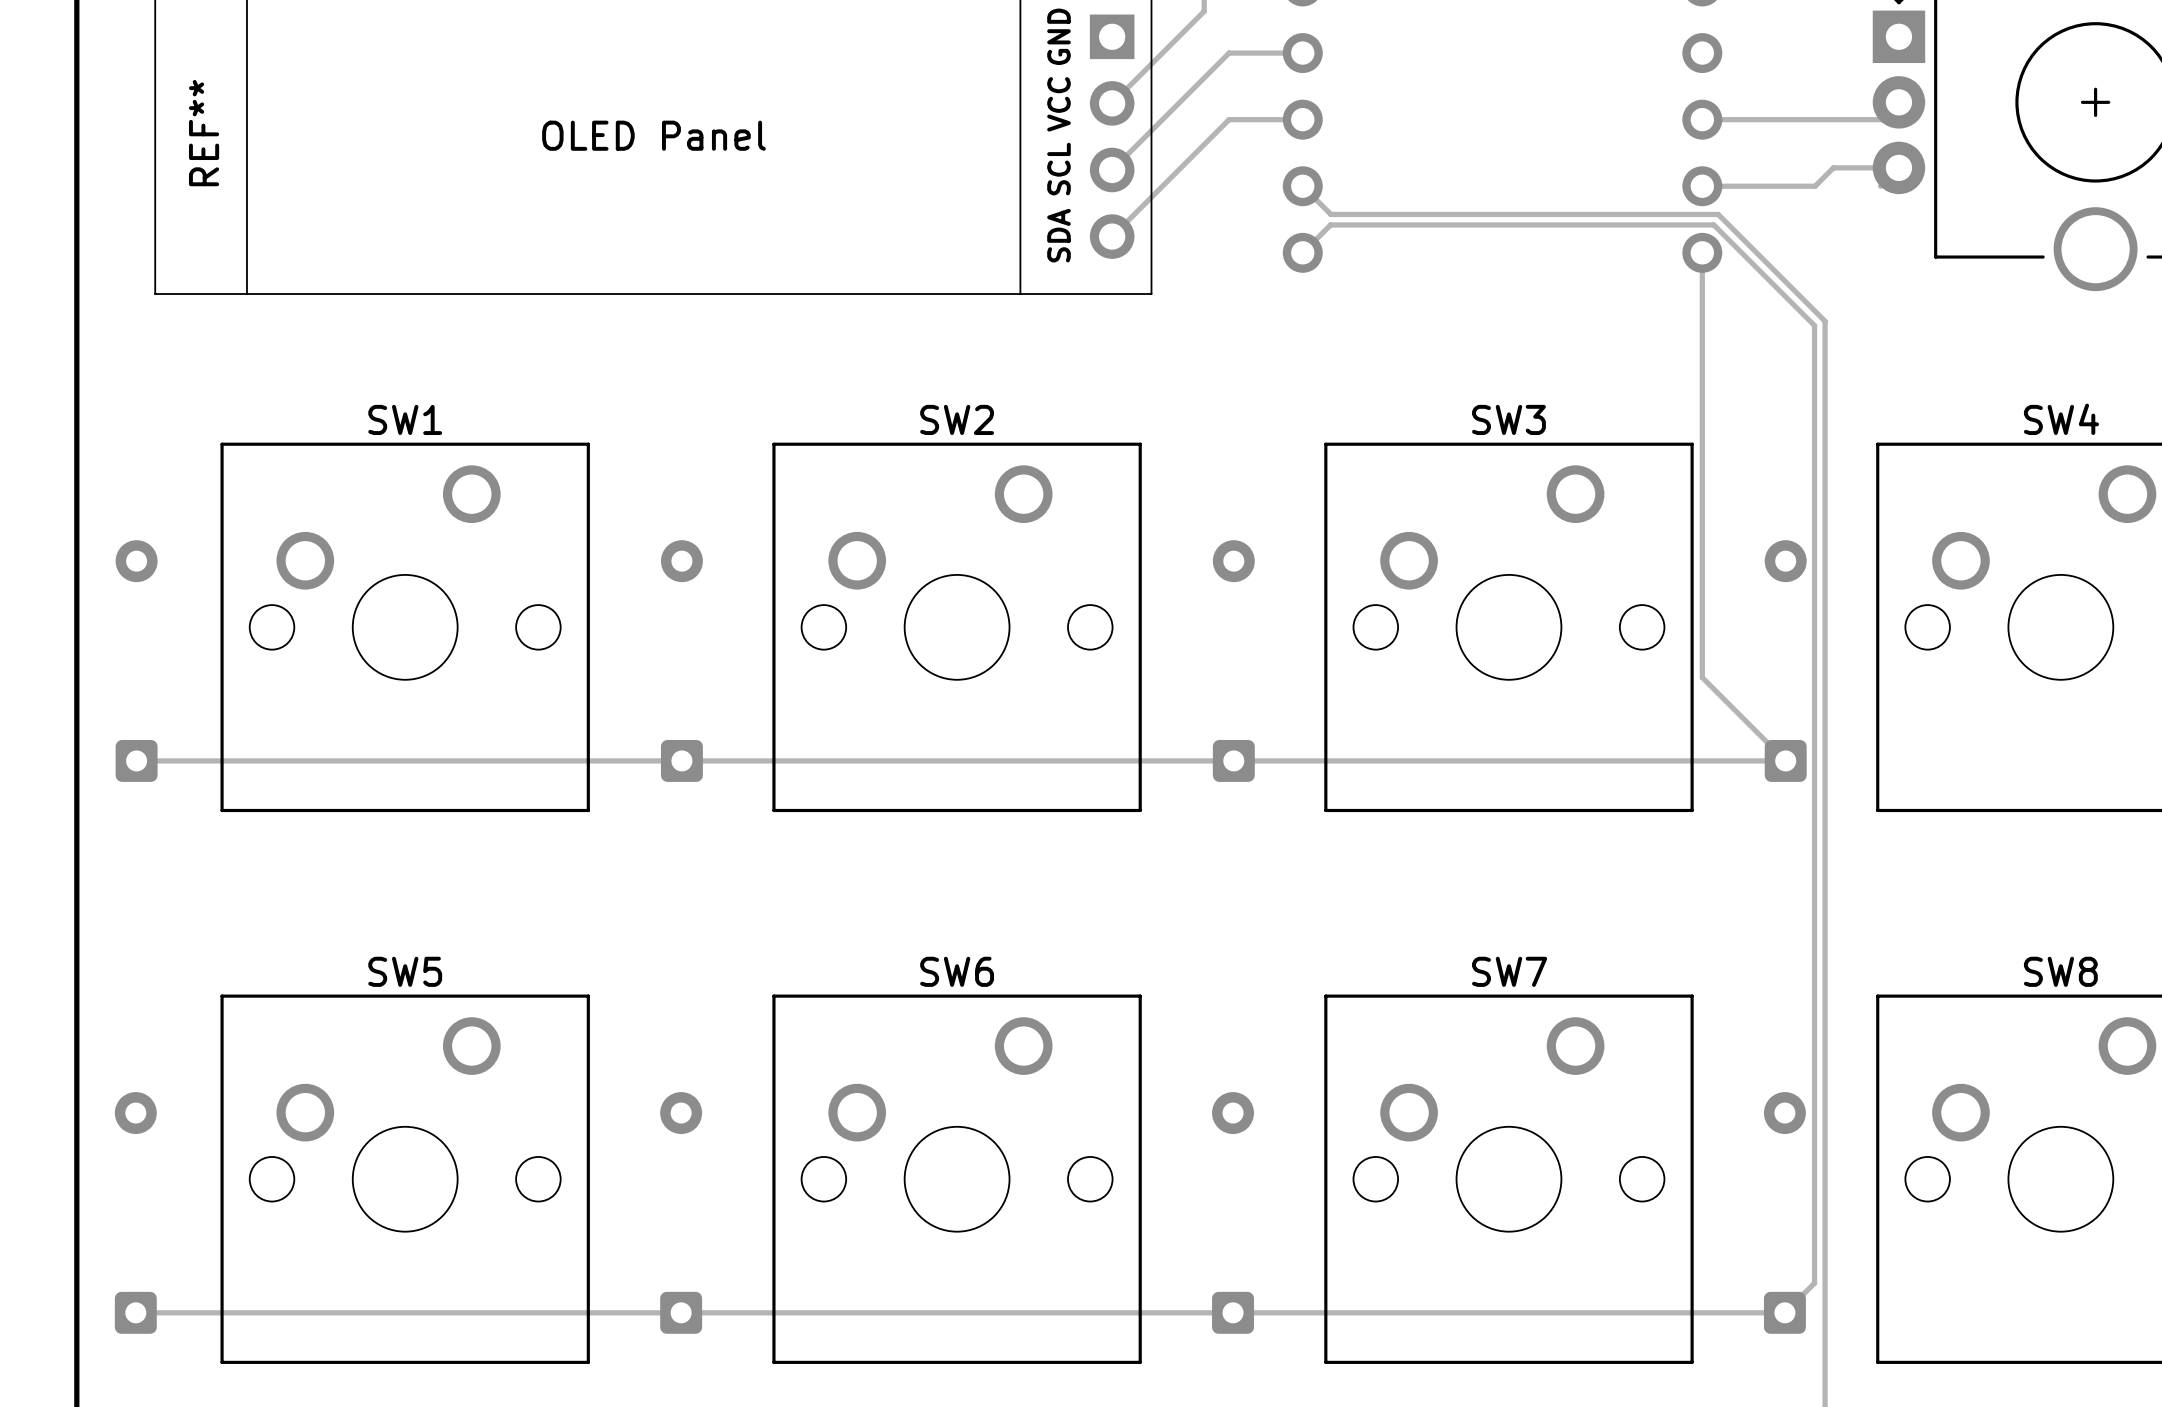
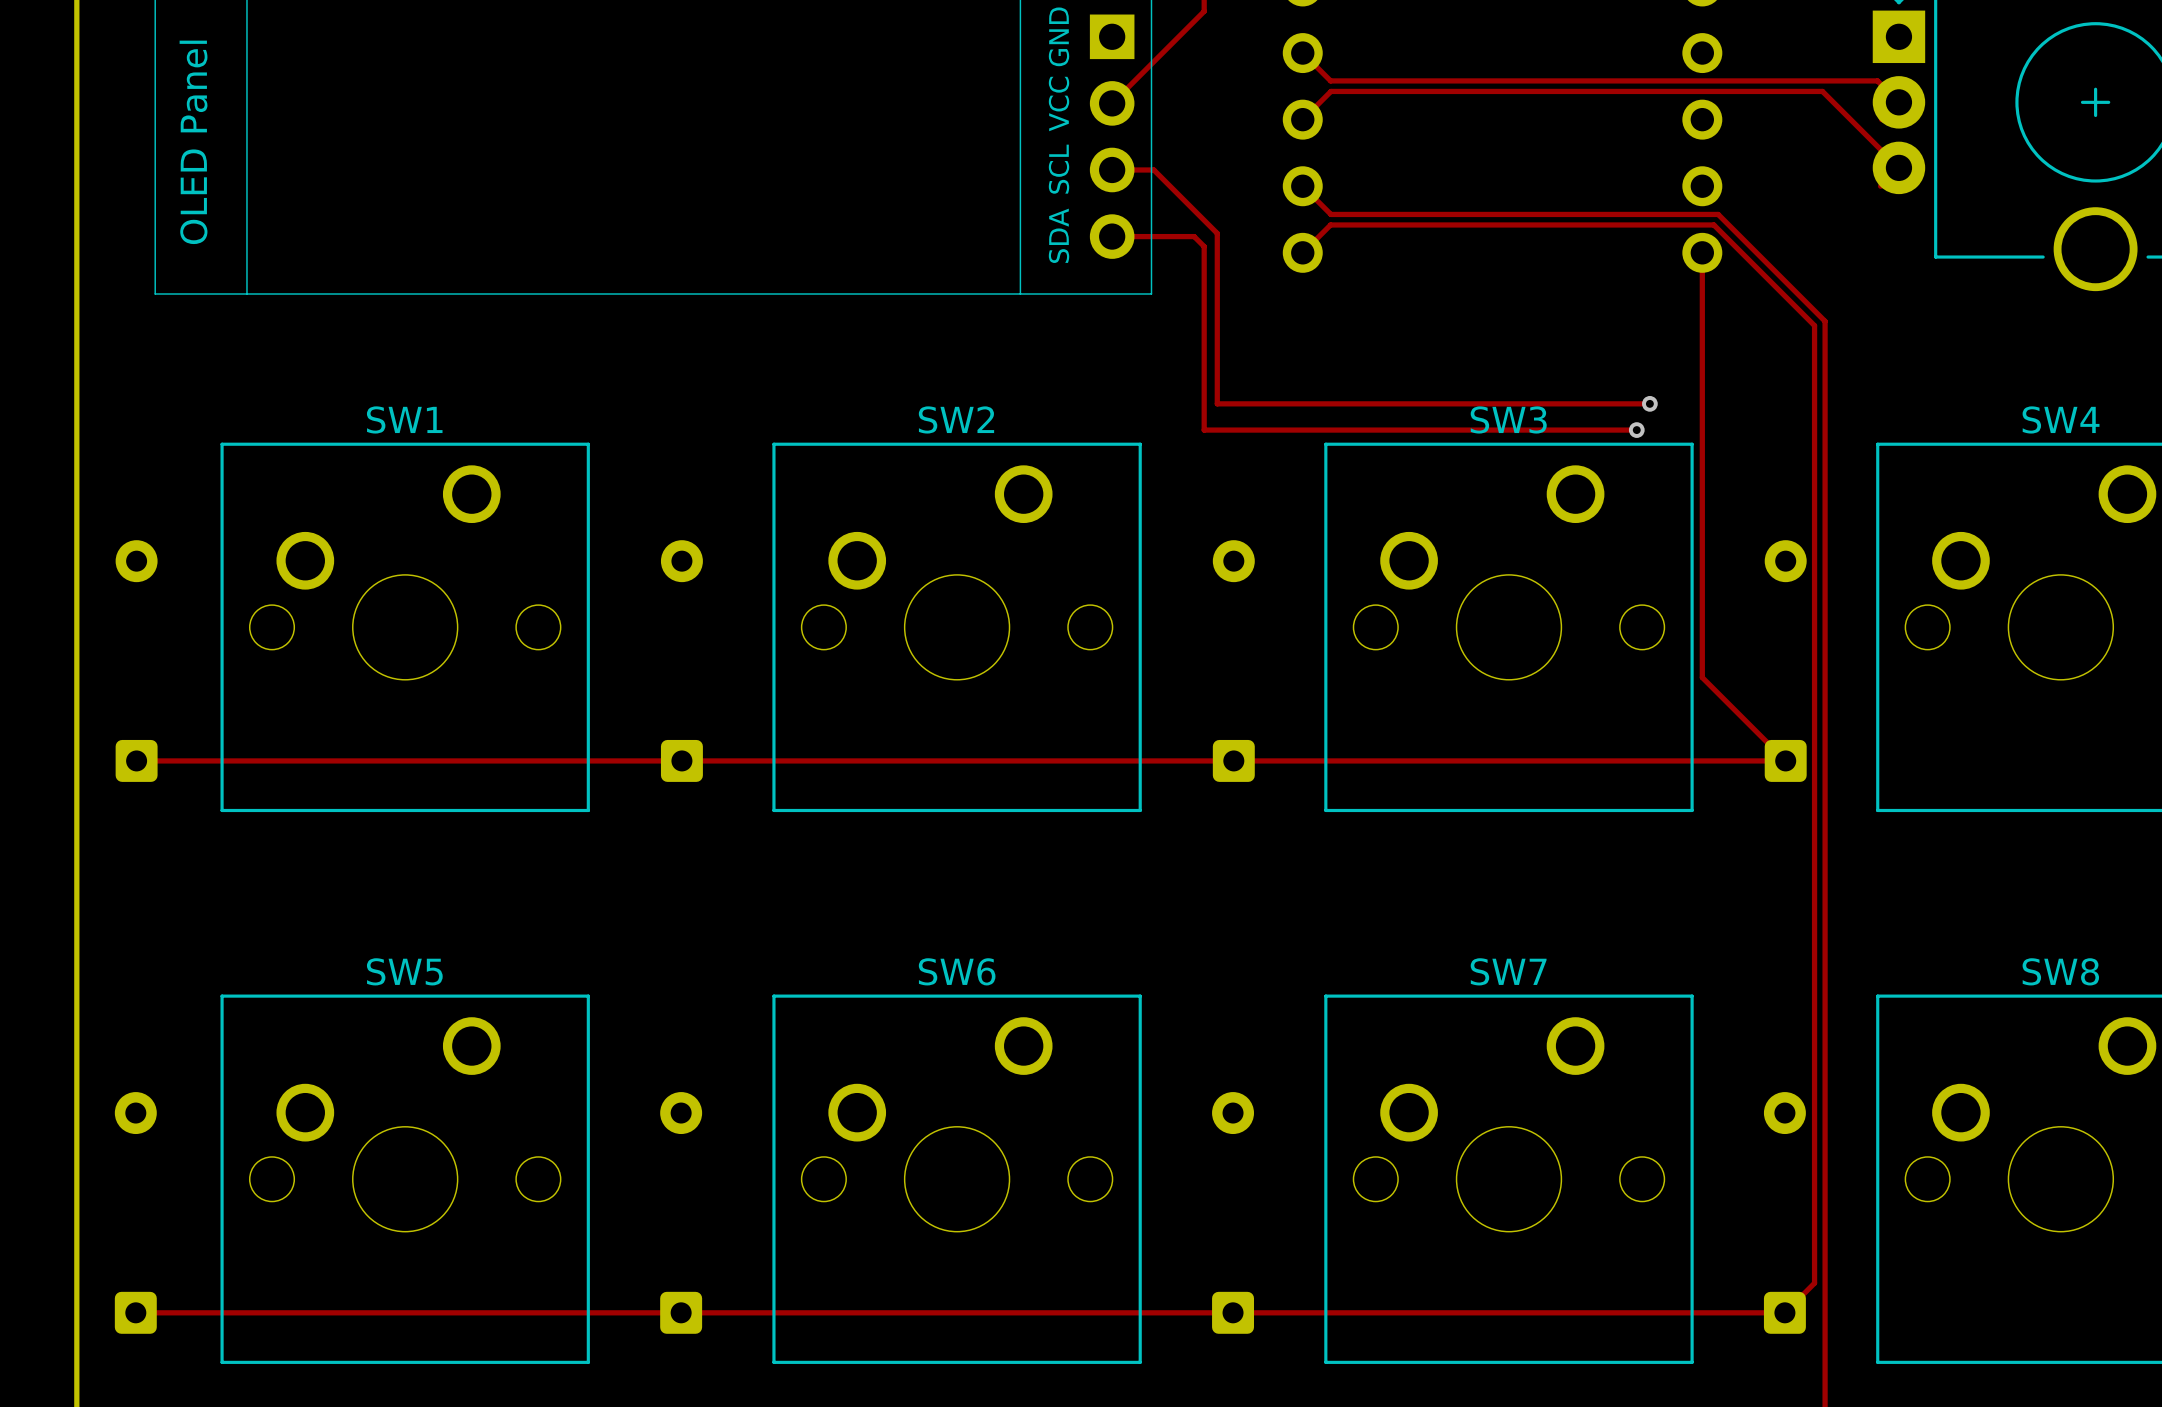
track: (1302, 53) (1229, 53) (1112, 169) -> (1649, 403) (1217, 403) (1217, 233) (1153, 169) (1112, 169)
track: none -> (1302, 53) (1330, 80) (1877, 80) (1898, 102)
track: (1302, 119) (1229, 119) (1112, 236) -> (1636, 430) (1204, 430) (1204, 246) (1194, 236) (1112, 236)
track: none -> (1302, 119) (1330, 91) (1822, 91) (1898, 167)
track: (1702, 119) (1881, 119) -> none
REF** name: REF** (204, 133) -> none
REF** text rotation: 0° (653, 135) -> 90° counterclockwise (193, 142)
REF** text position: OLED Panel (653, 135) -> OLED Panel (193, 142)
track: (1885, 167) (1833, 167) (1815, 186) (1702, 186) -> none
via: none -> (1649, 403)
via: none -> (1636, 430)

